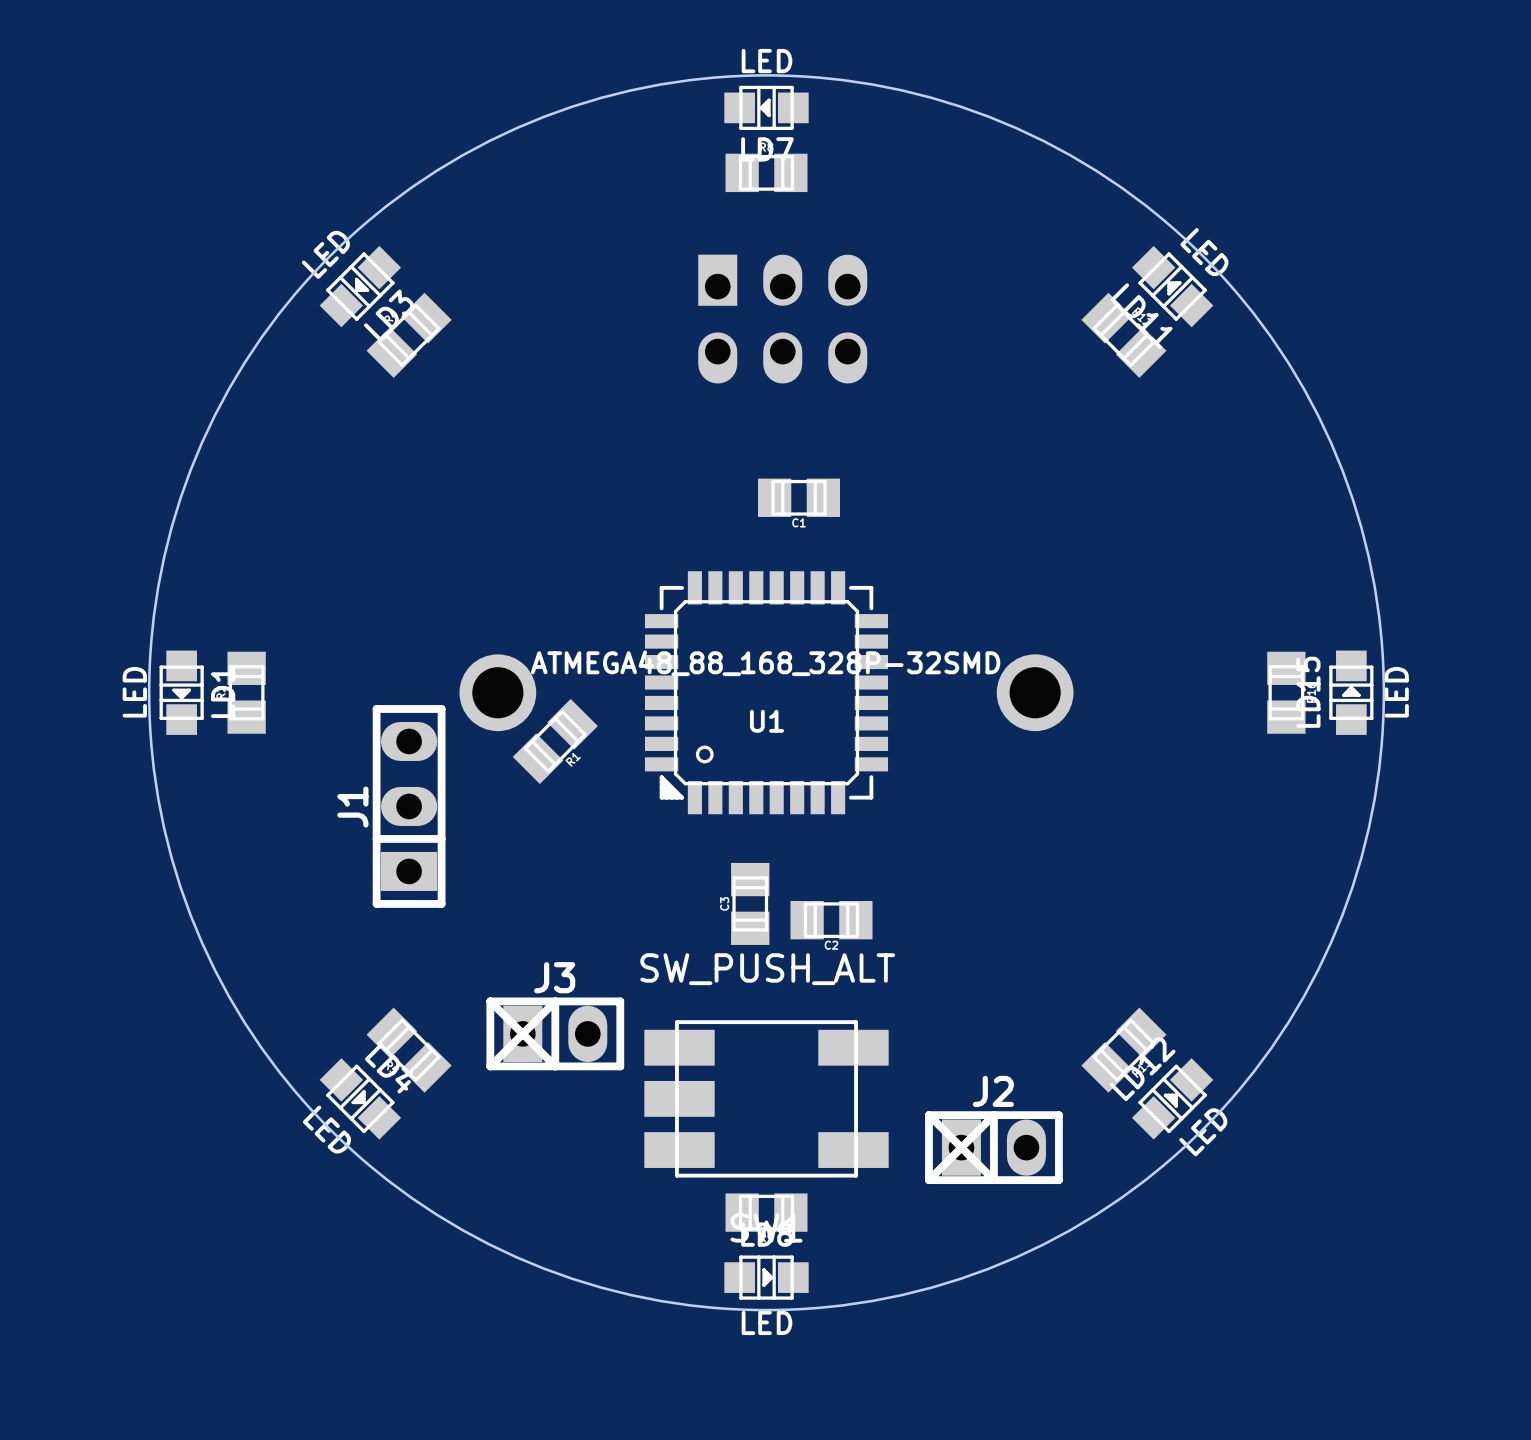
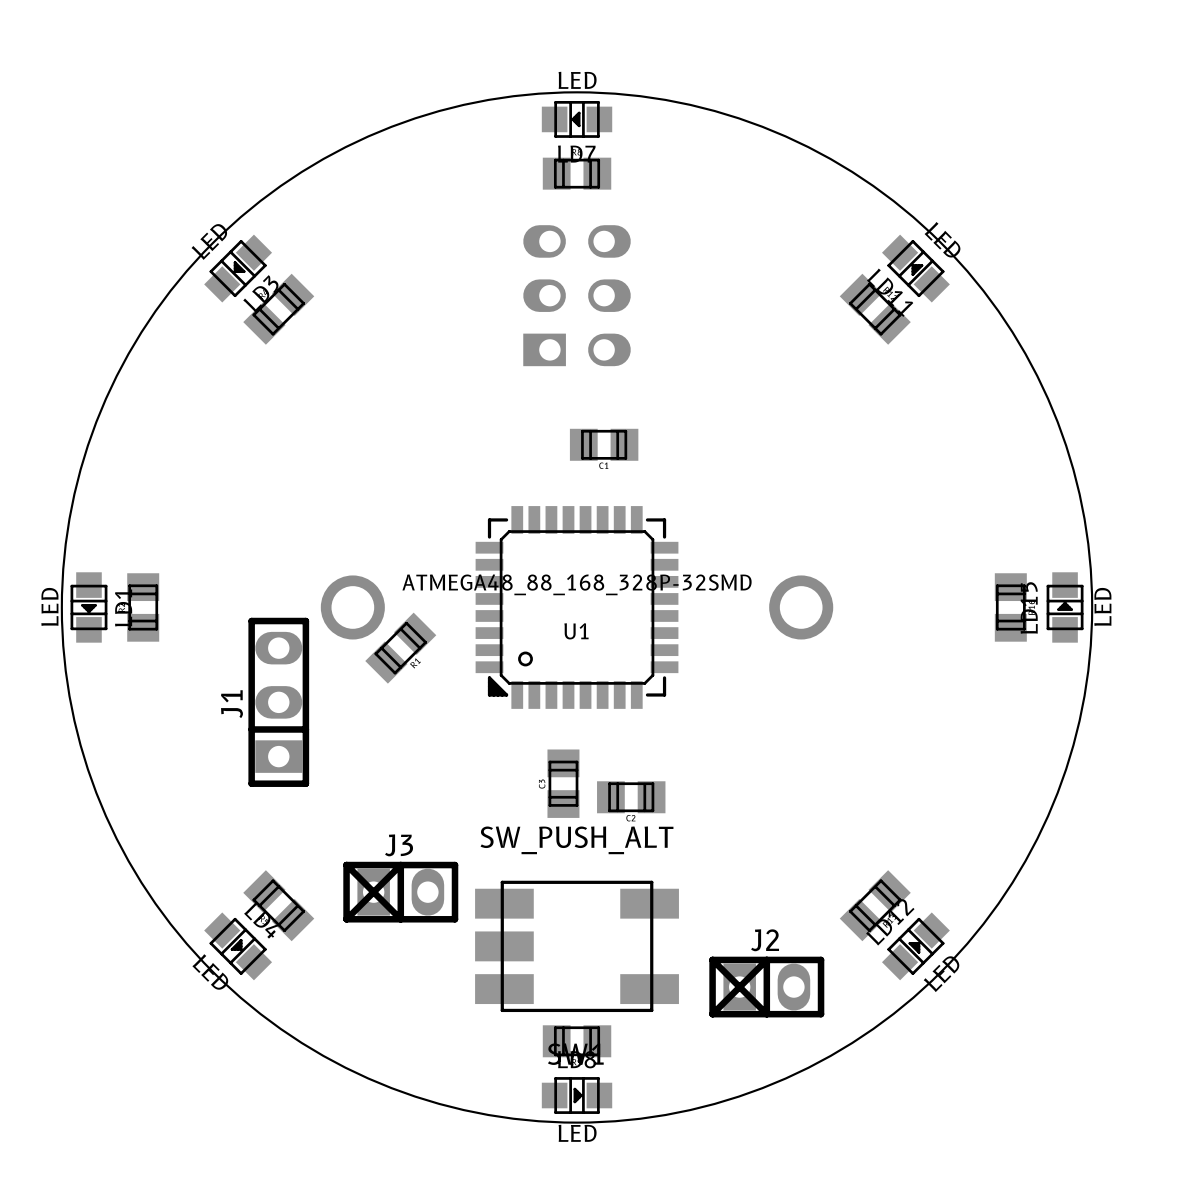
part rotation: 0° (782, 319) -> 90° counterclockwise (577, 295)

